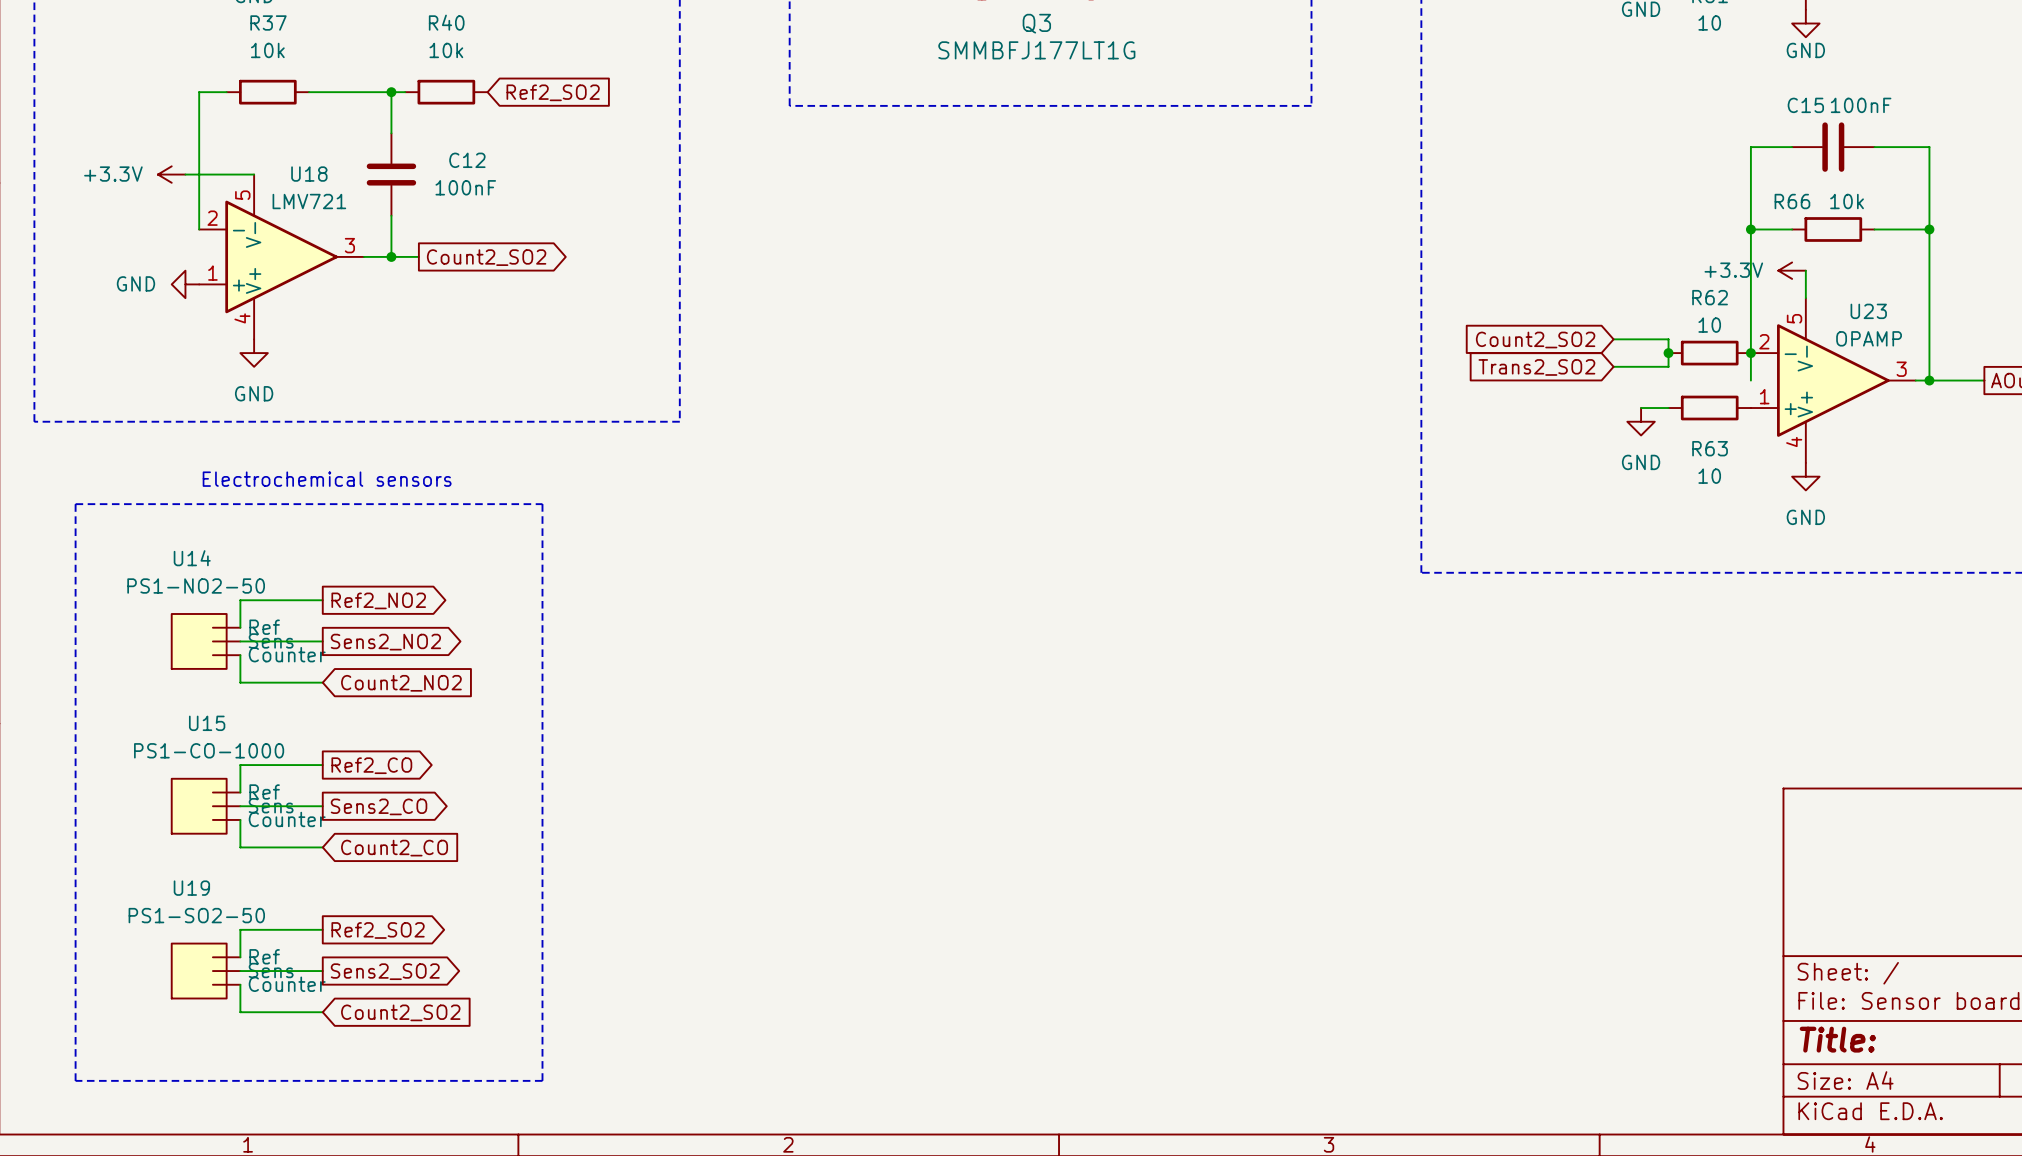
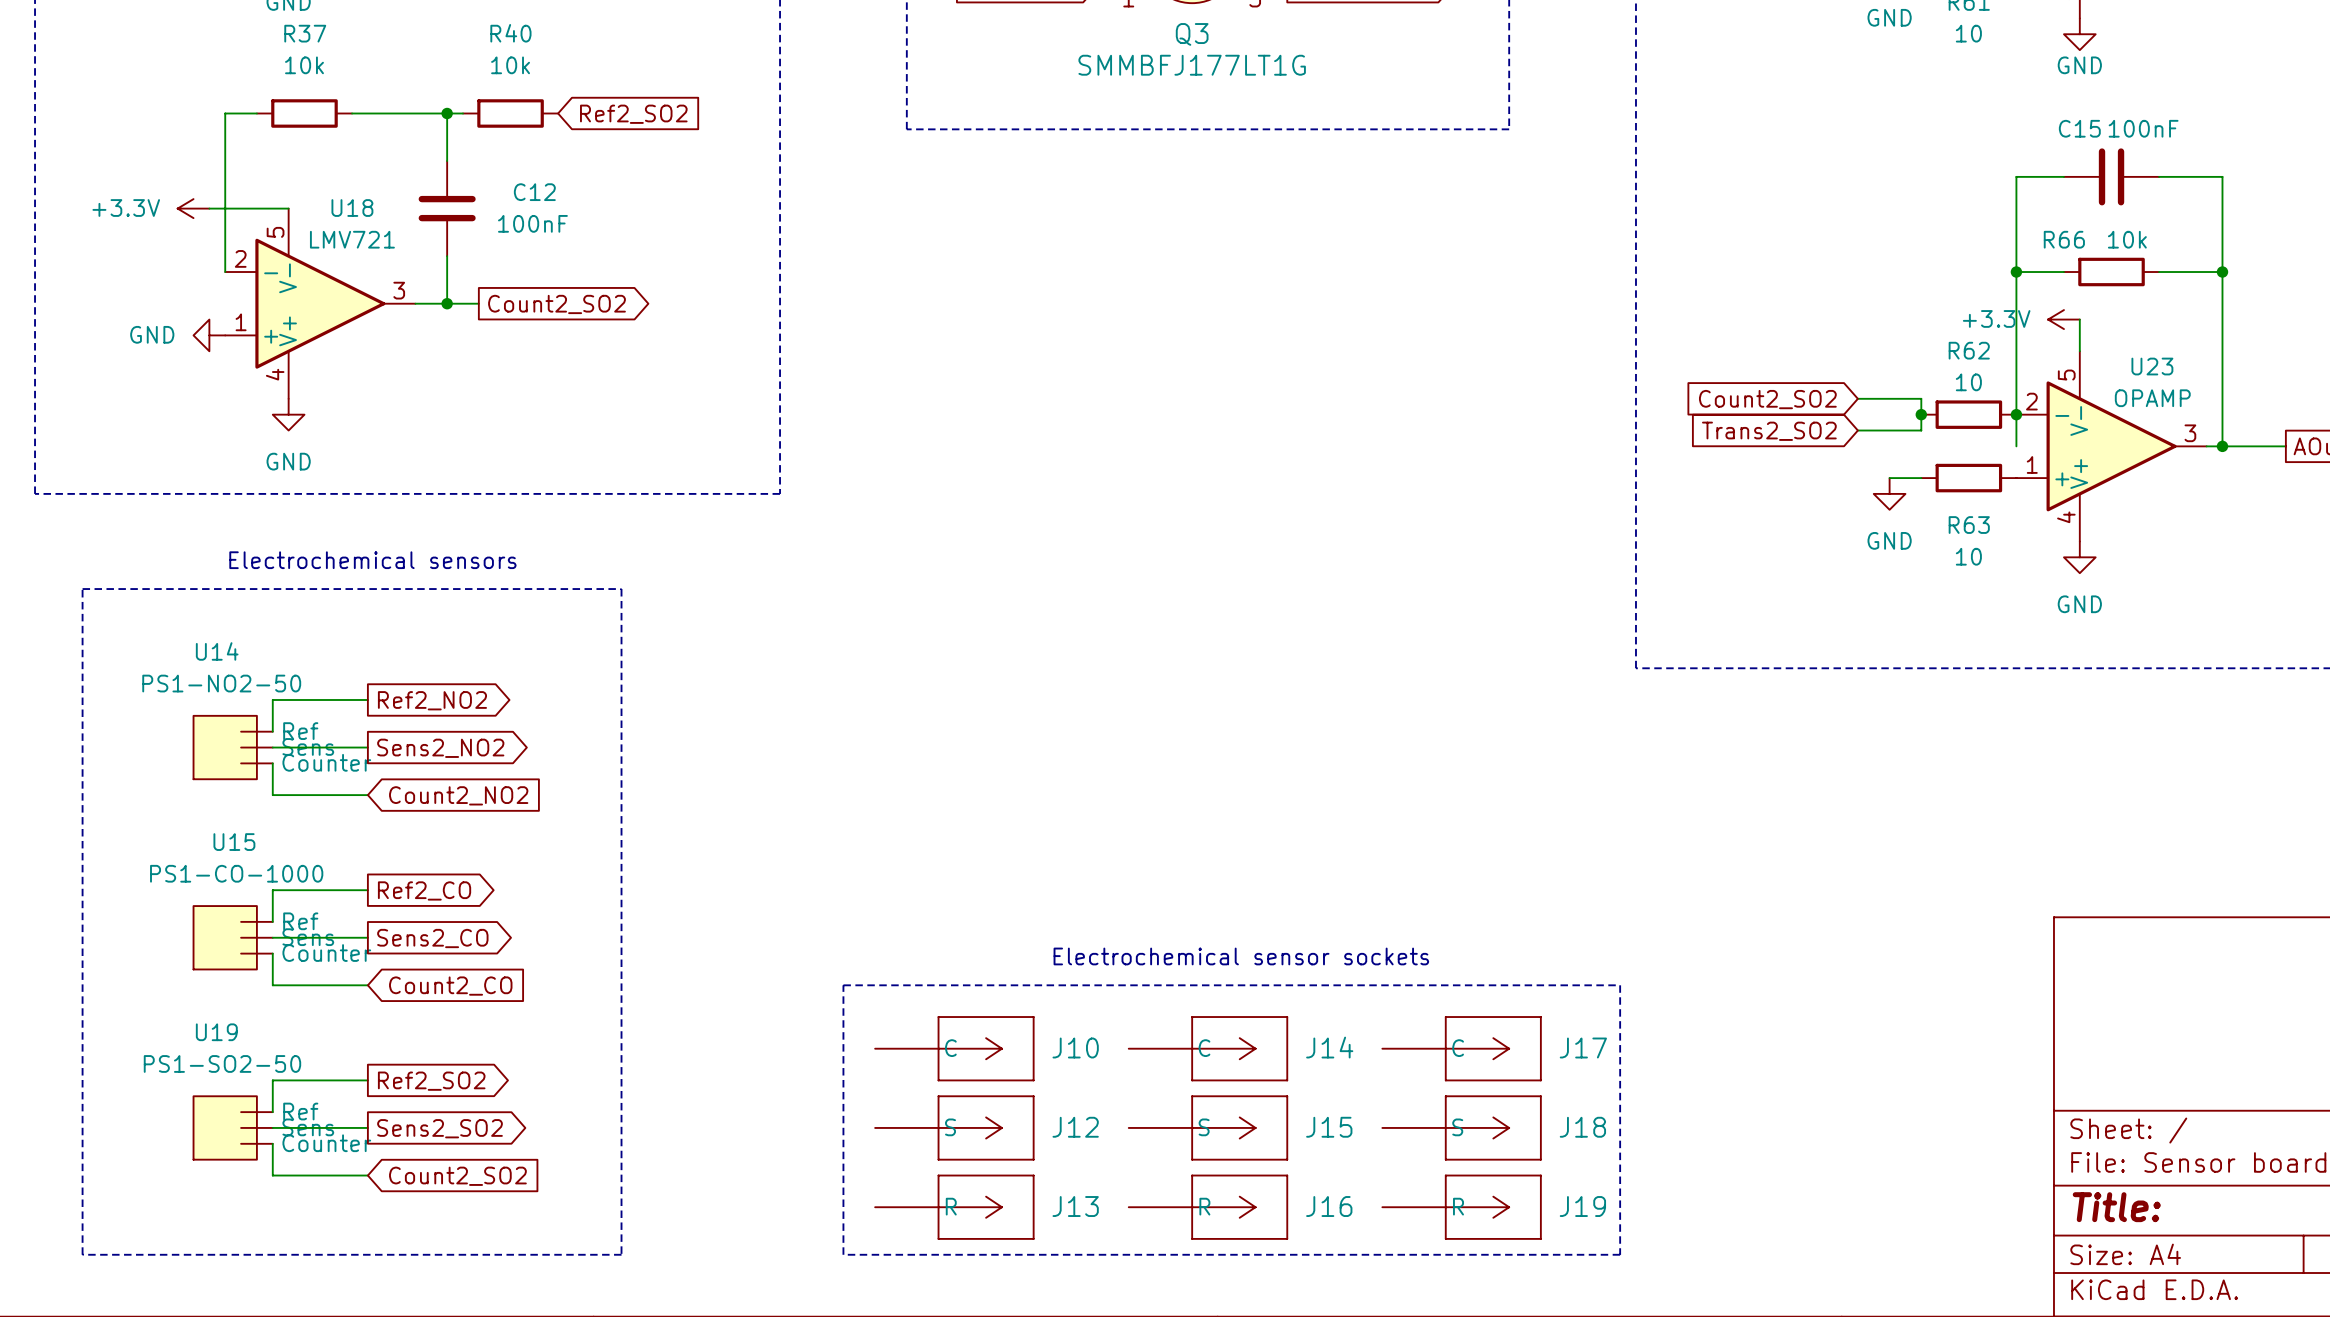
text: none -> Electrochemical sensor sockets (1241, 956)
line: none -> (843, 985) (1620, 985) (1620, 1254) (843, 1254) (843, 985)
J10: none -> (954, 1048)
J14: none -> (1208, 1048)
J17: none -> (1462, 1048)
J12: none -> (954, 1127)
J15: none -> (1208, 1127)
J18: none -> (1462, 1127)
J13: none -> (954, 1207)
J16: none -> (1208, 1207)
J19: none -> (1462, 1207)

